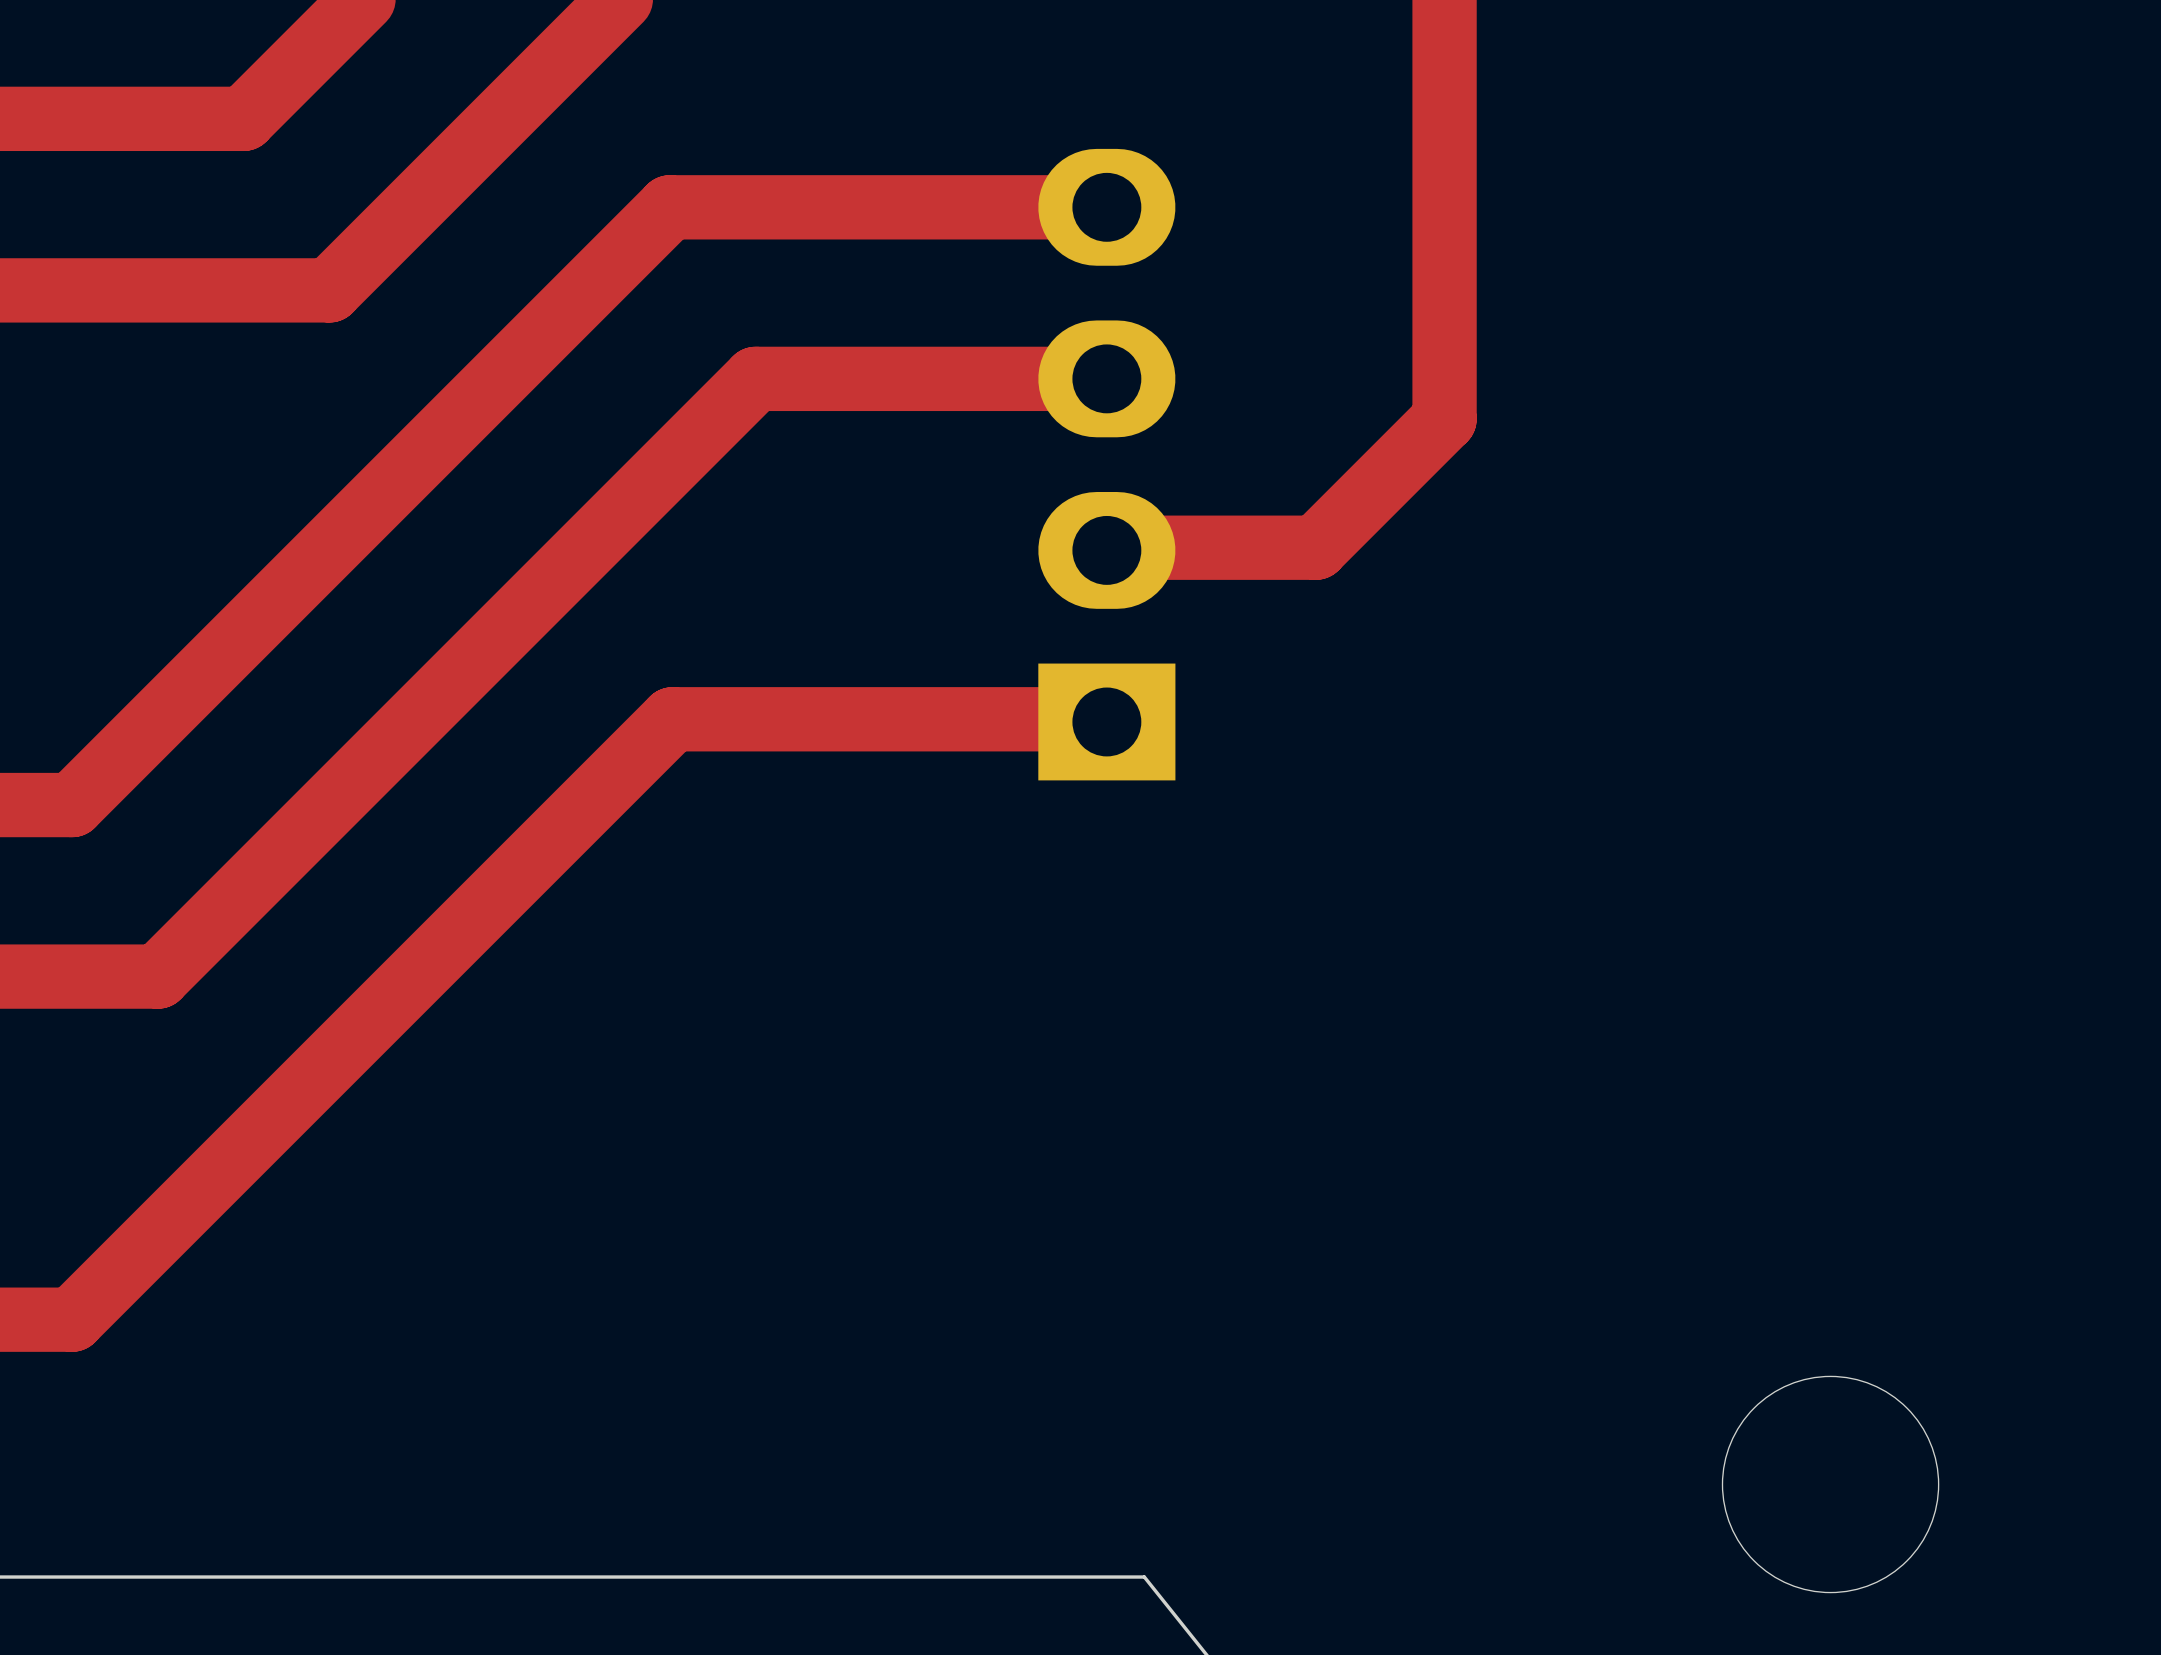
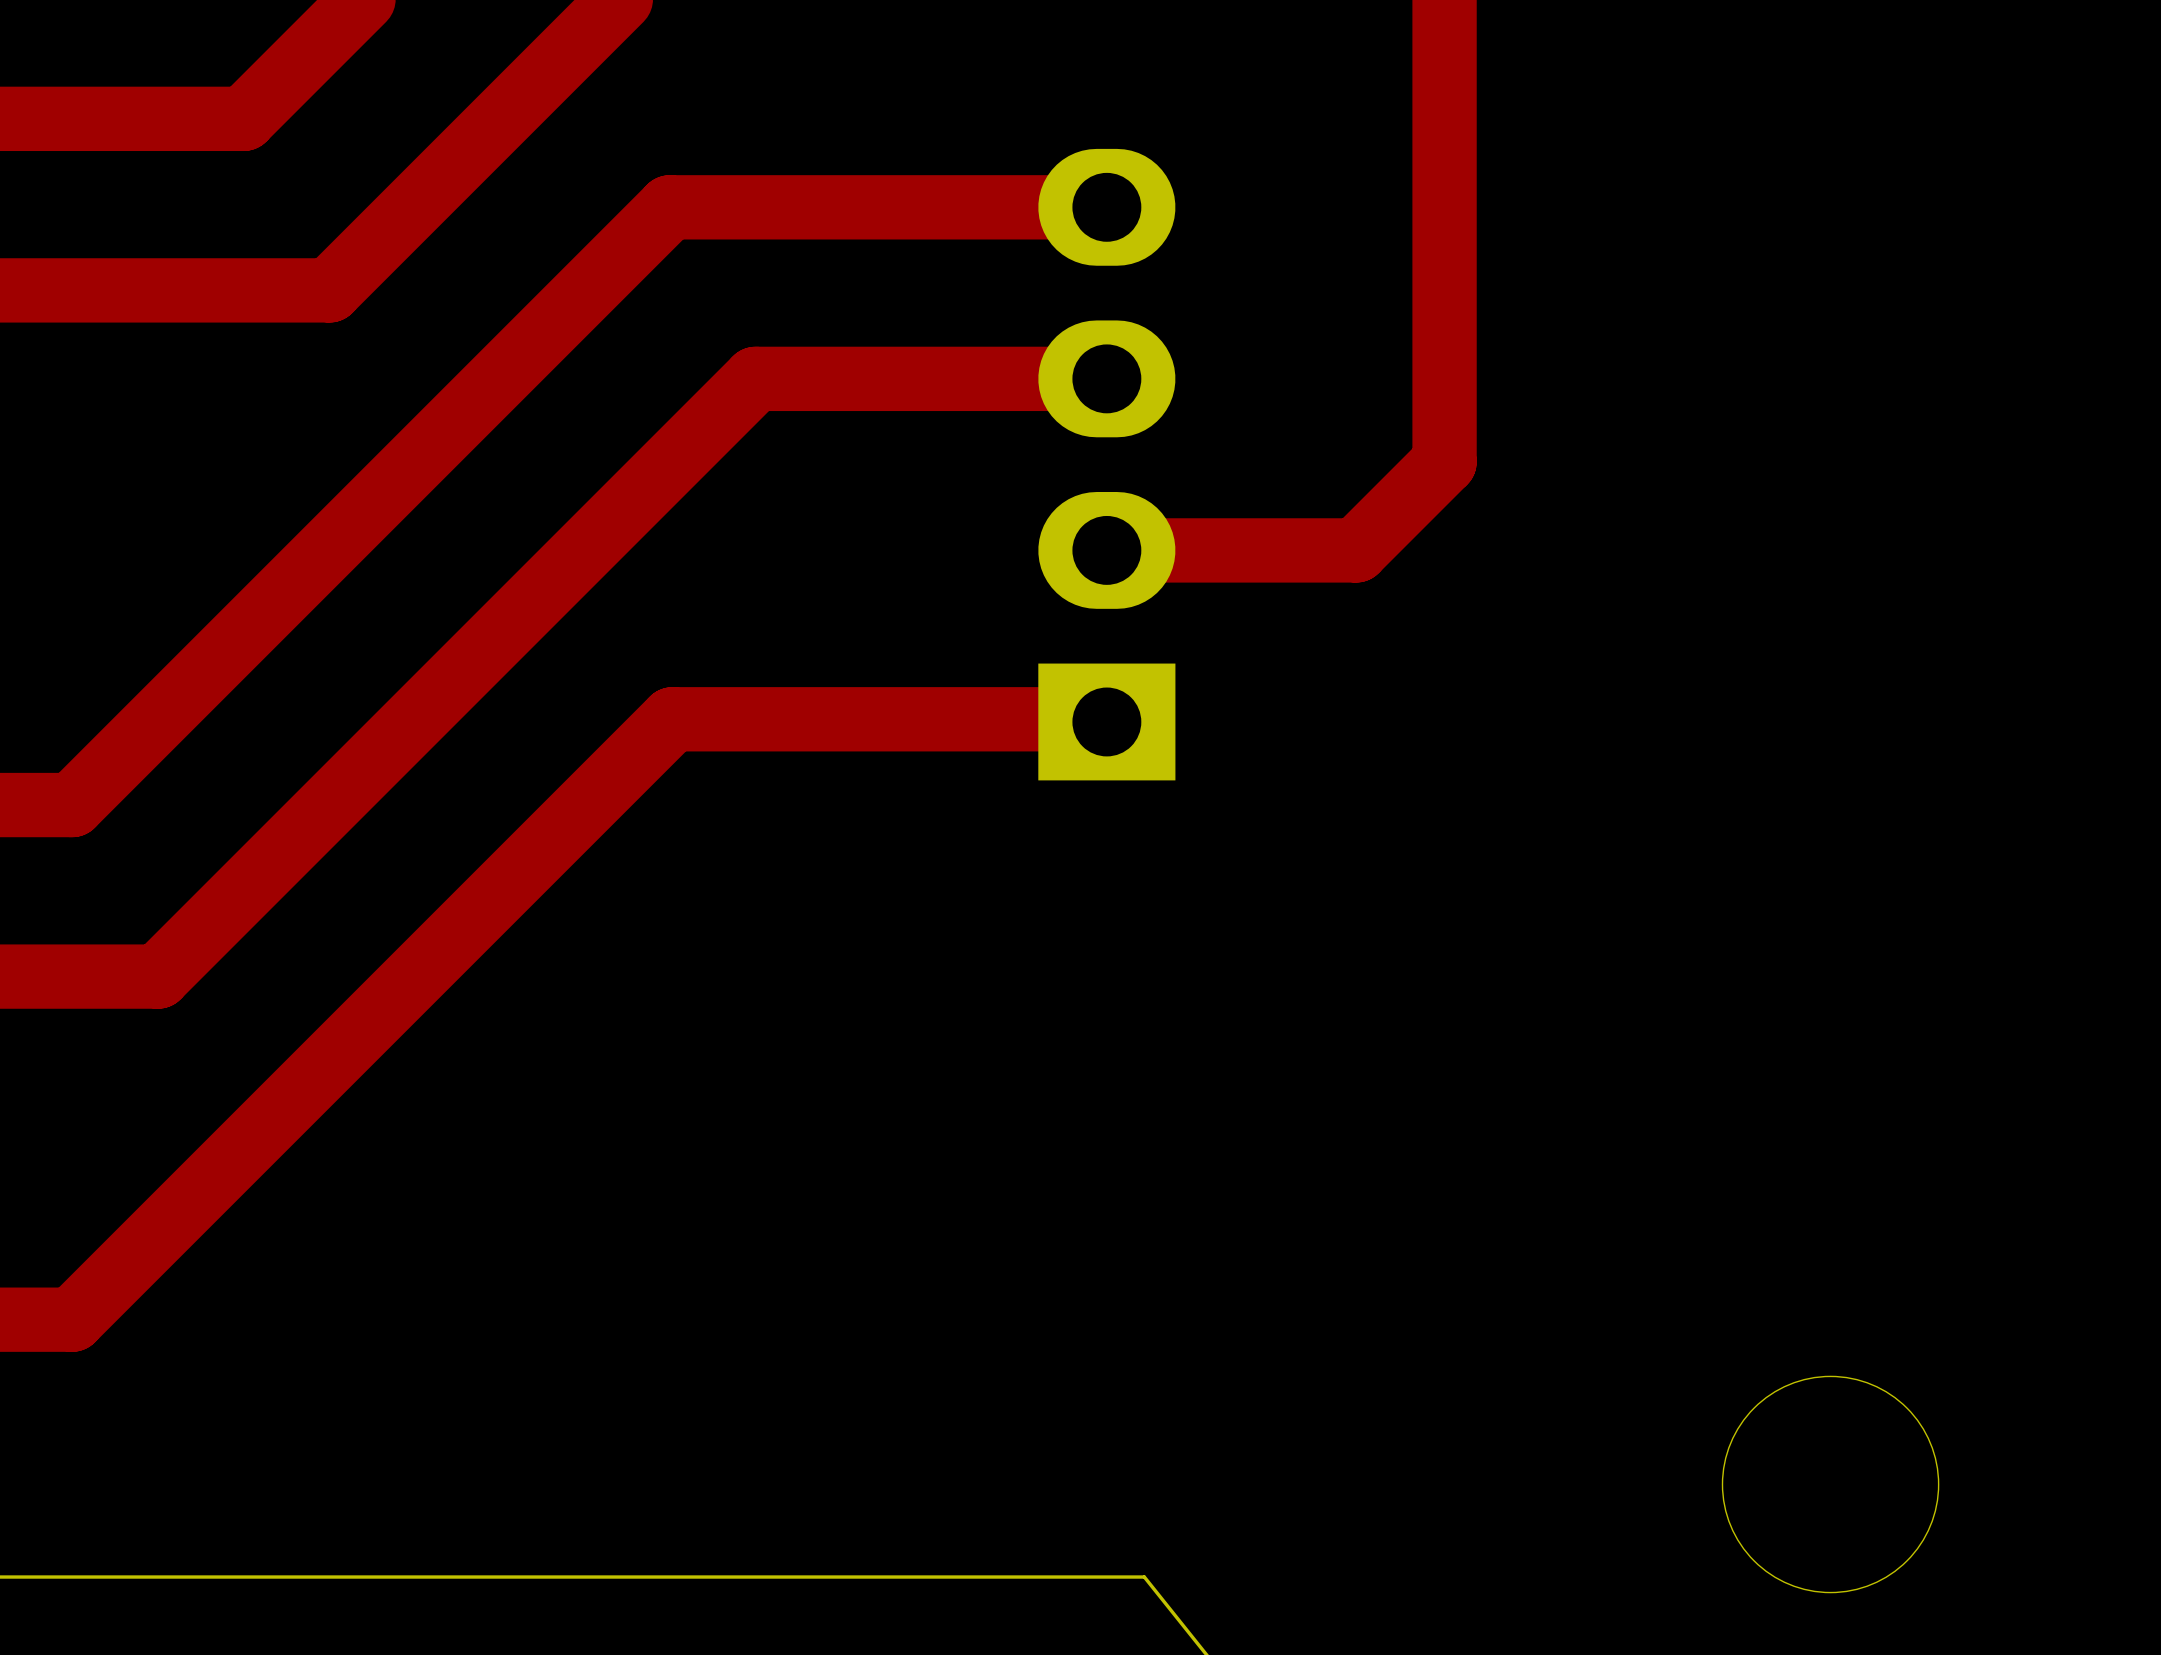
top track: (1444, 419) (1315, 547) (1109, 547) (1106, 550) -> (1444, 419) (1444, 461) (1356, 550) (1106, 550)

